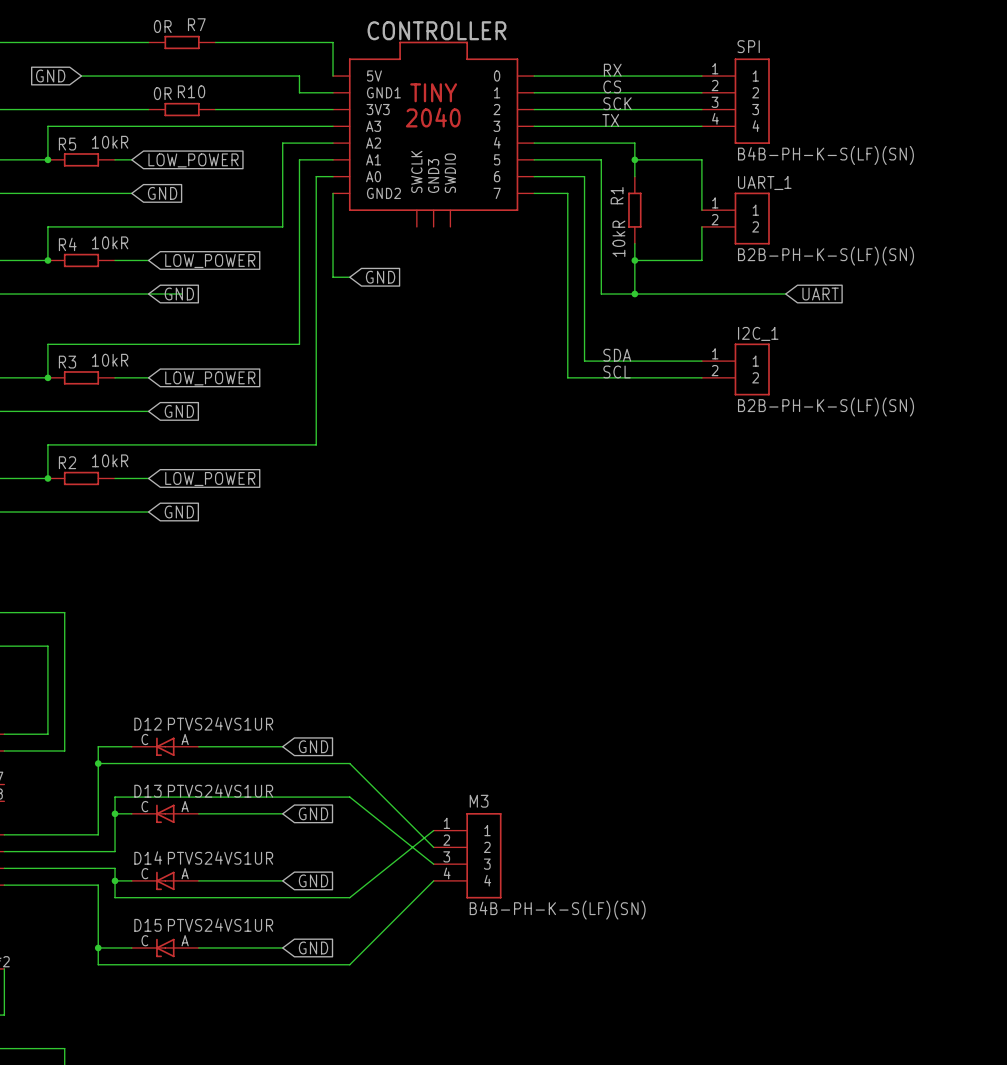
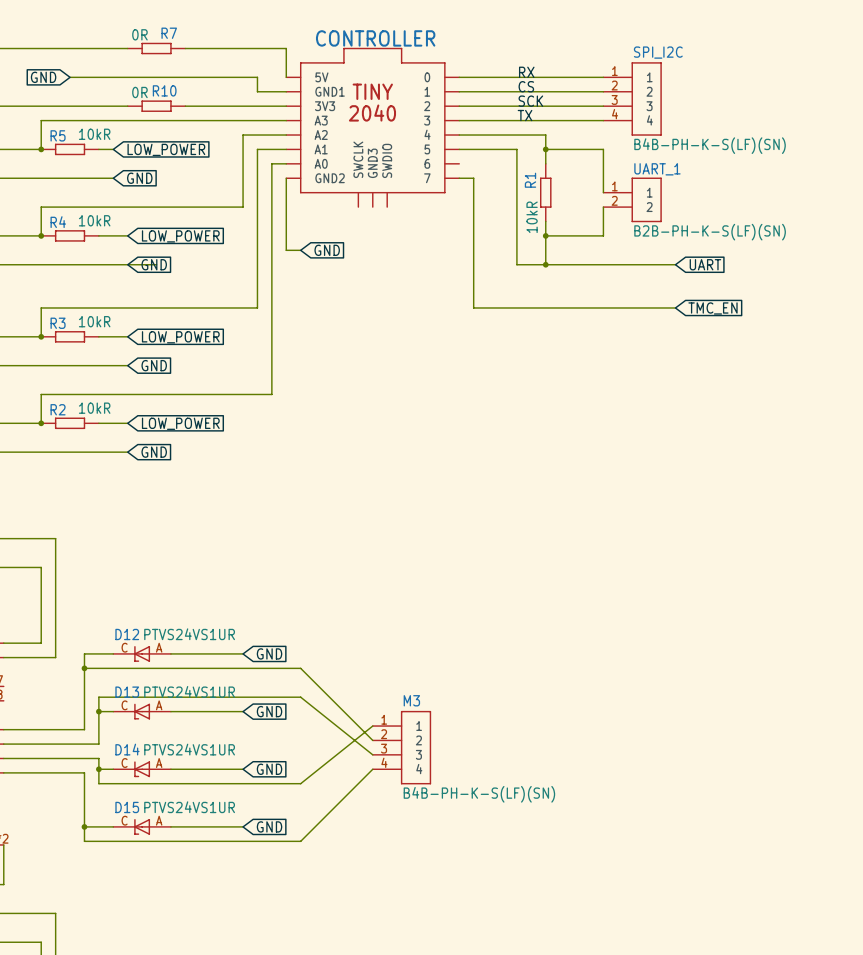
SPI name: SPI (748, 46) -> SPI_I2C (658, 52)
wire: (534, 176) (584, 176) (584, 361) (701, 361) -> none
wire: (551, 193) (567, 193) (567, 377) (701, 377) -> (473, 178) (473, 307) (675, 307)
global label: none -> TMC_EN (713, 308)
label: SDA (617, 355) -> none
I2C_1: B2B-PH-K-S(LF)(SN) (735, 369) -> none
label: SCL (617, 371) -> none

